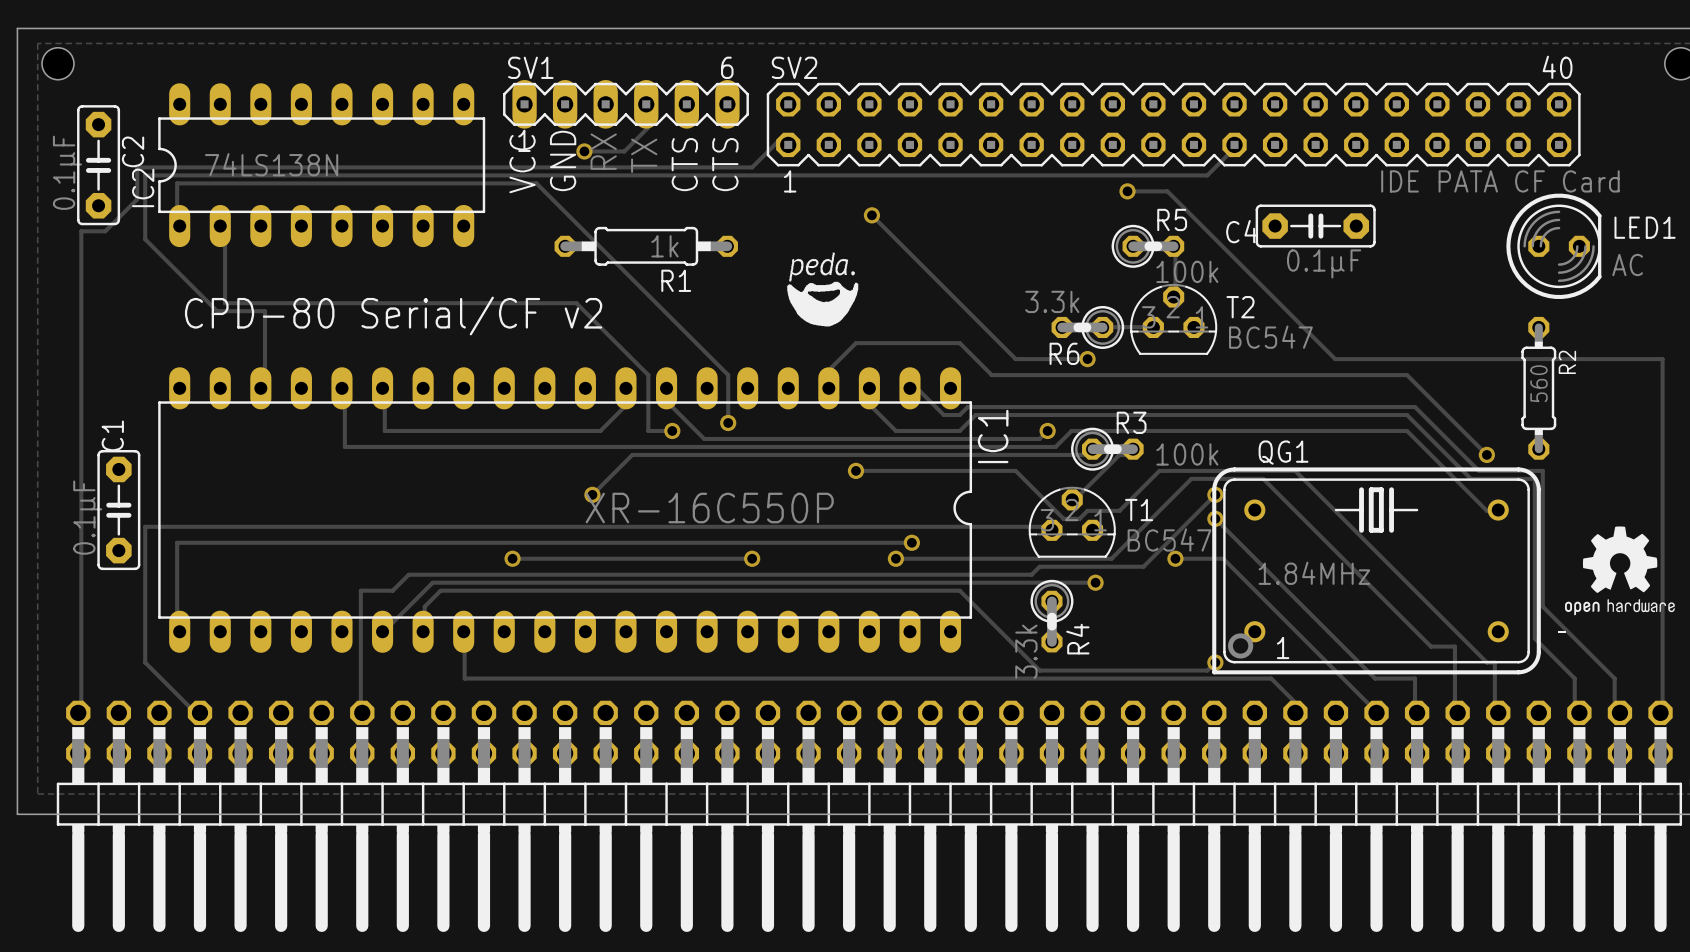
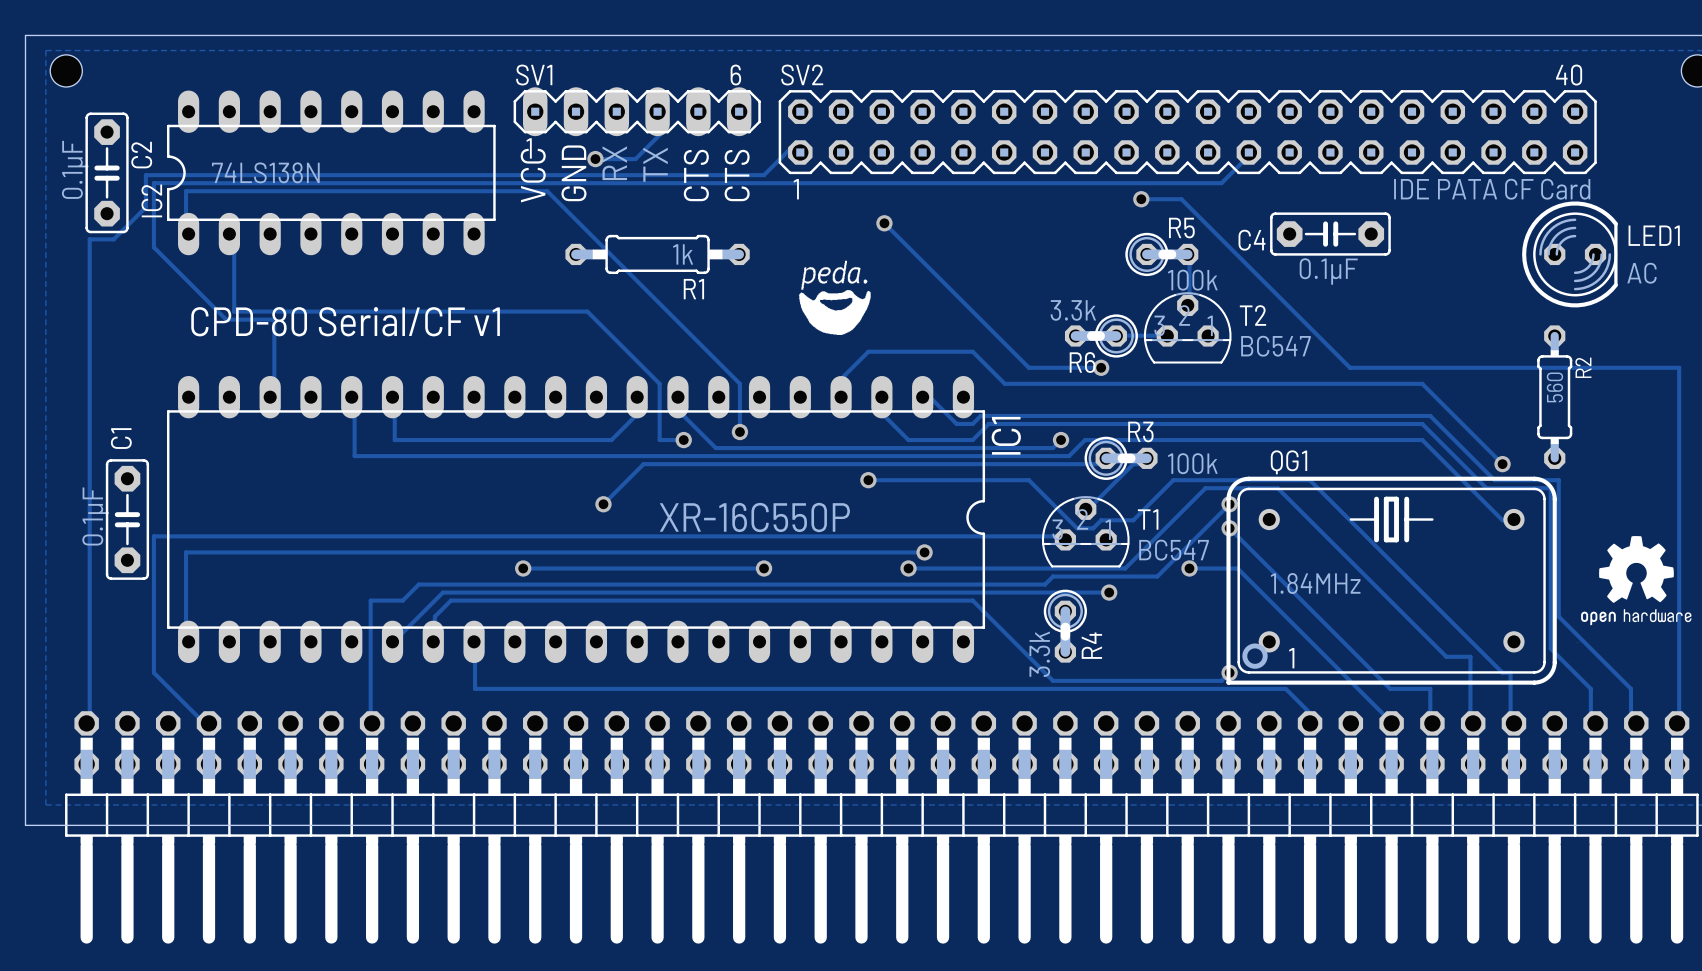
text: CPD-80 Serial/CF v2 (393, 315) -> CPD-80 Serial/CF v1 (345, 321)

